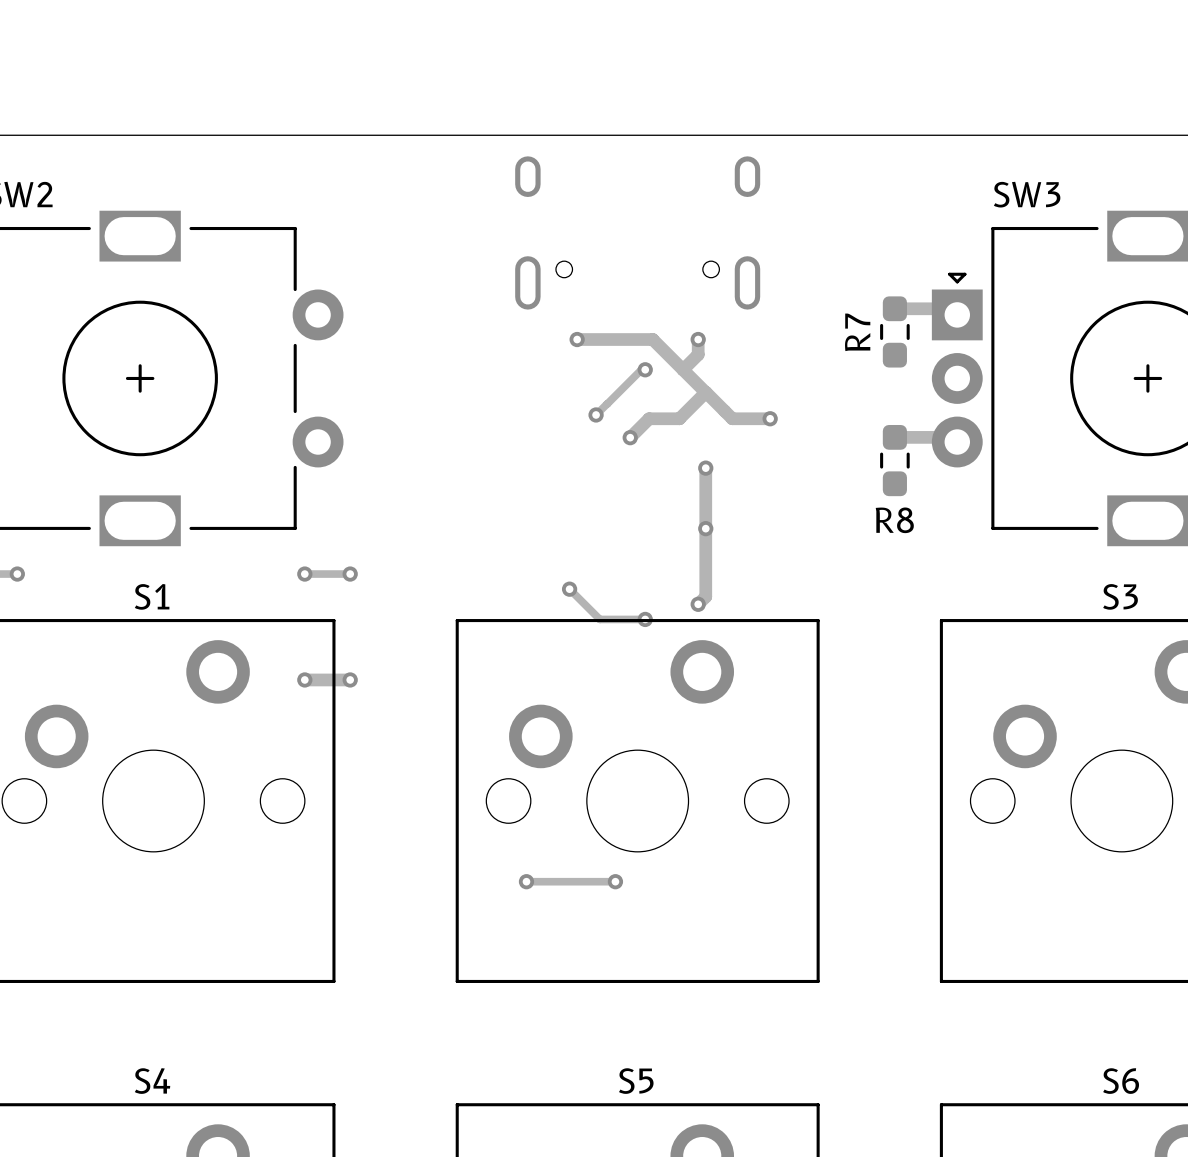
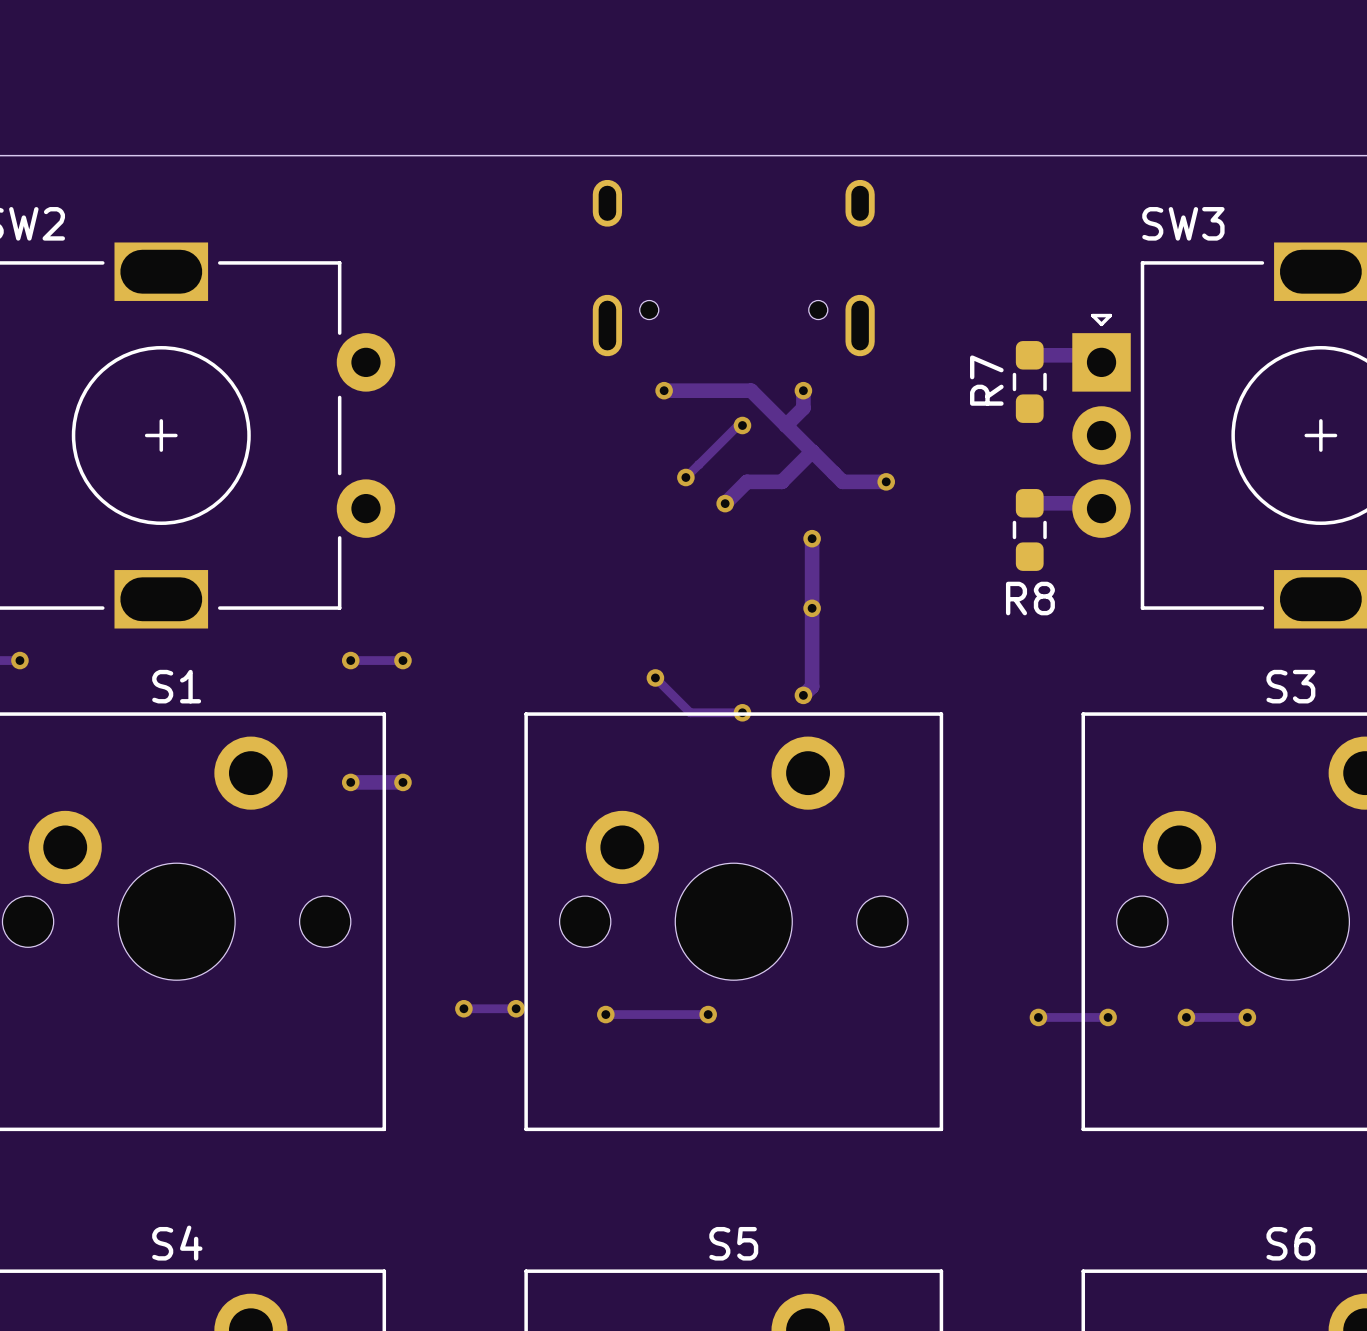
track: none -> (463, 1008) (516, 1008)
via: none -> (463, 1008)
via: none -> (516, 1008)
track: none -> (1038, 1017) (1108, 1017)
via: none -> (1038, 1017)
via: none -> (1108, 1017)
track: none -> (1186, 1017) (1247, 1017)
via: none -> (1186, 1017)
via: none -> (1247, 1017)

